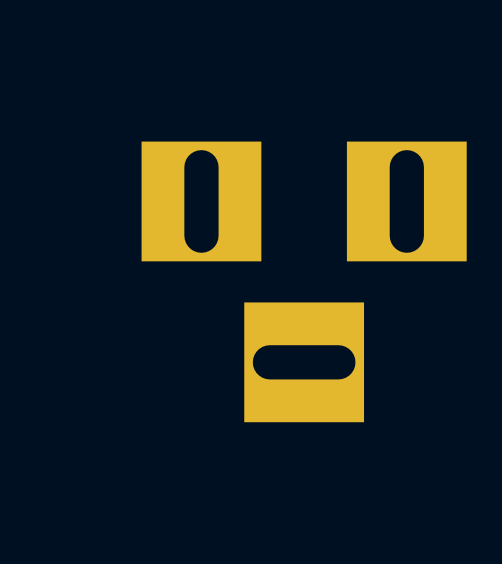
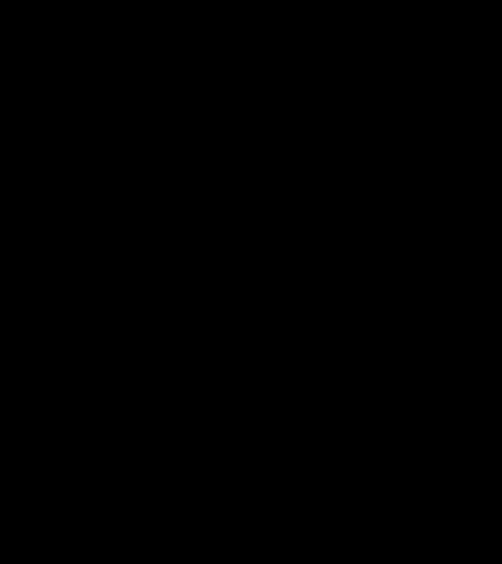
part: (304, 281) -> none

